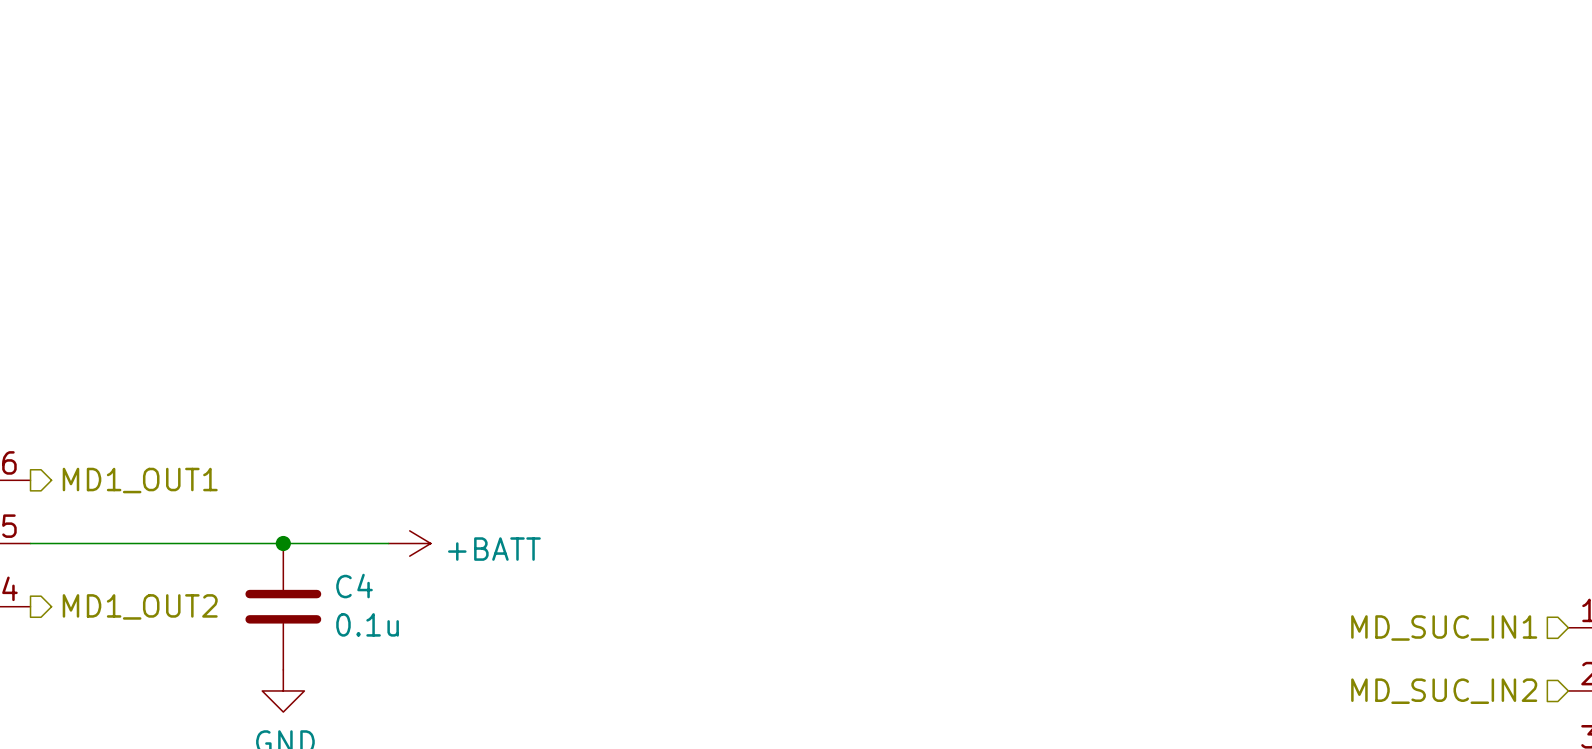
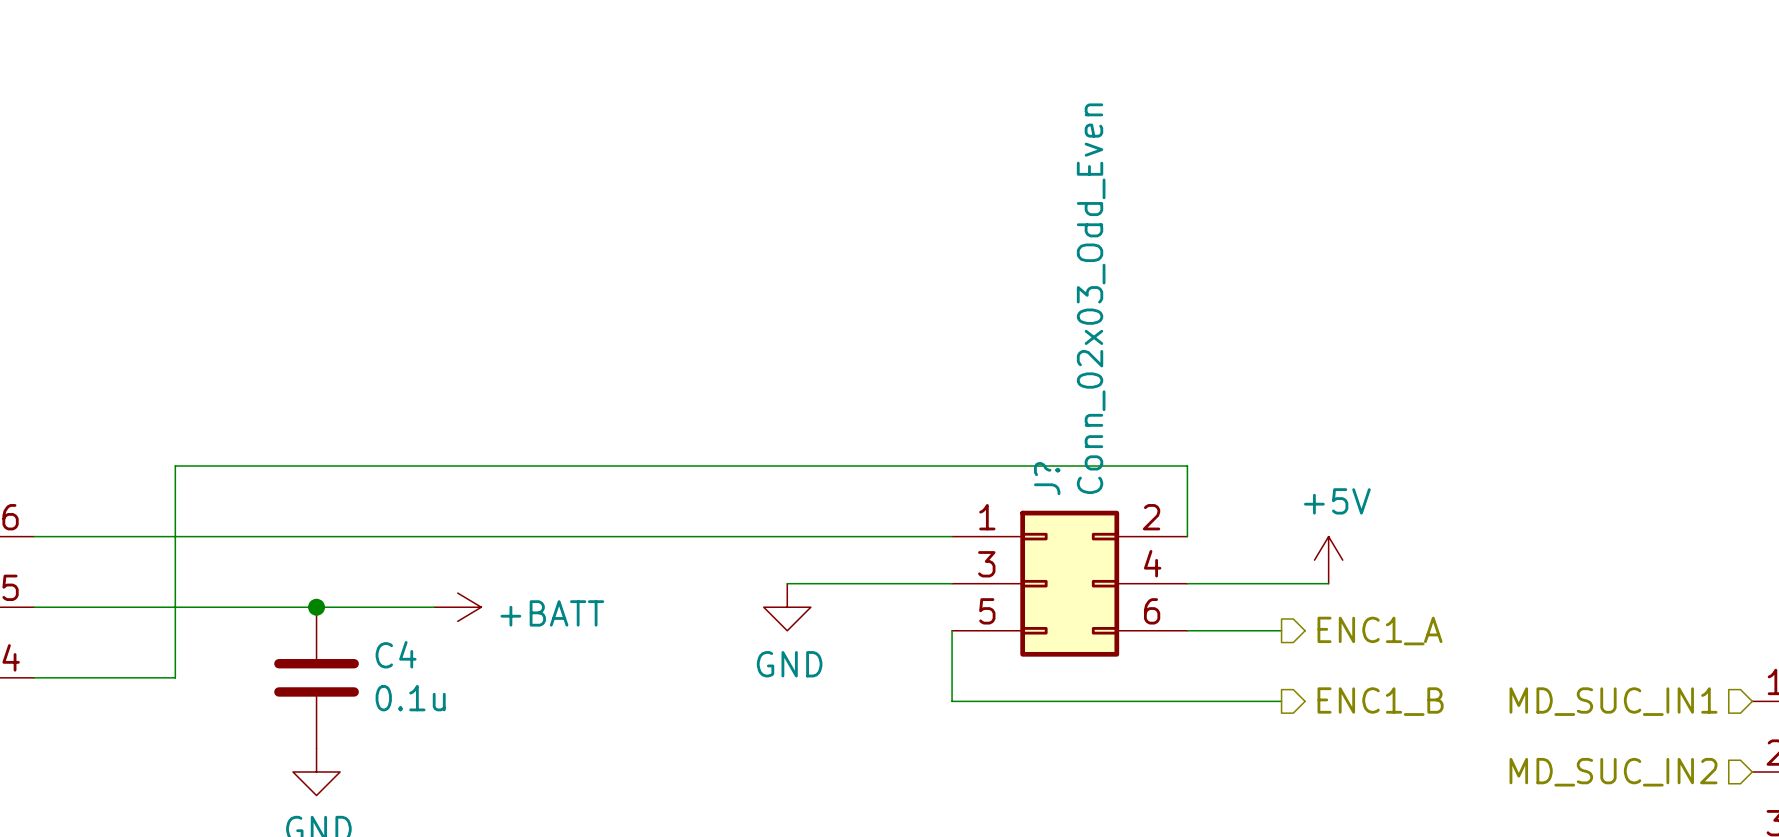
wire: none -> (34, 536) (952, 536)
hierarchical label: MD1_OUT1 (140, 480) -> none
wire: none -> (1187, 536) (1187, 466) (175, 466) (175, 677) (34, 677)
power symbol: none -> +5V (1328, 560)
wire: none -> (787, 583) (952, 583)
J?: none -> Conn_02x03_Odd_Even (1069, 583)
wire: none -> (1187, 583) (1328, 583)
power symbol: none -> GND (787, 607)
wire: none -> (952, 630) (952, 701) (1281, 701)
wire: none -> (1187, 630) (1281, 630)
hierarchical label: none -> ENC1_A (1380, 631)
hierarchical label: MD1_OUT2 (140, 606) -> none
hierarchical label: none -> ENC1_B (1380, 701)

